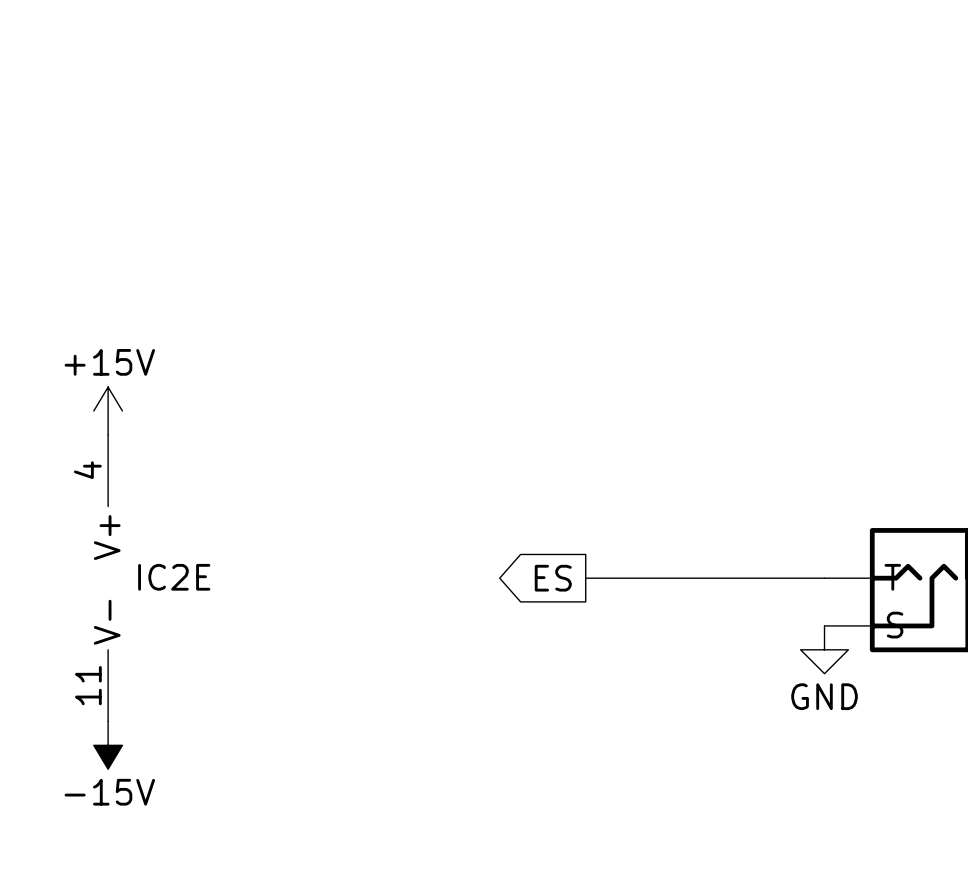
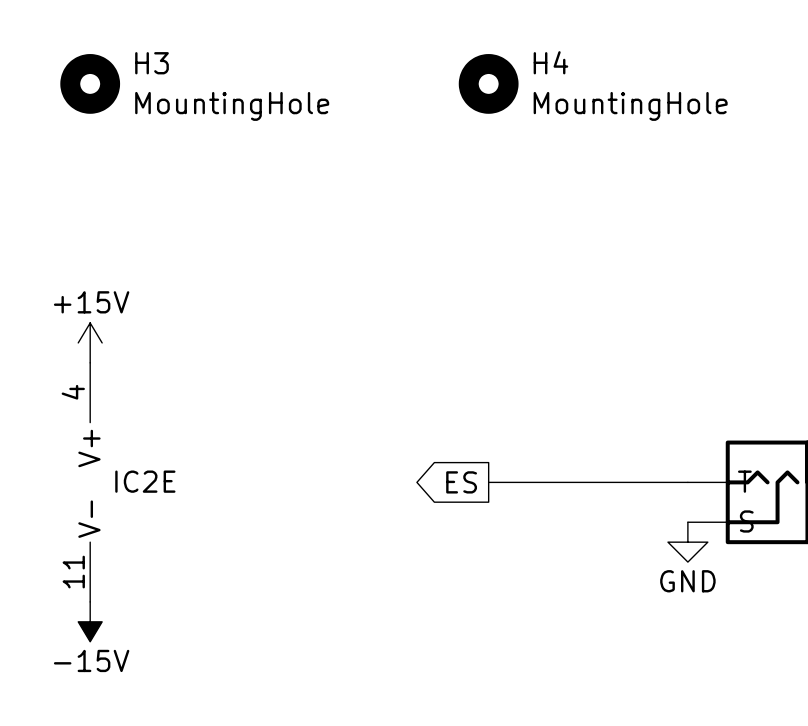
H3: none -> MountingHole (90, 83)
H4: none -> MountingHole (488, 83)

